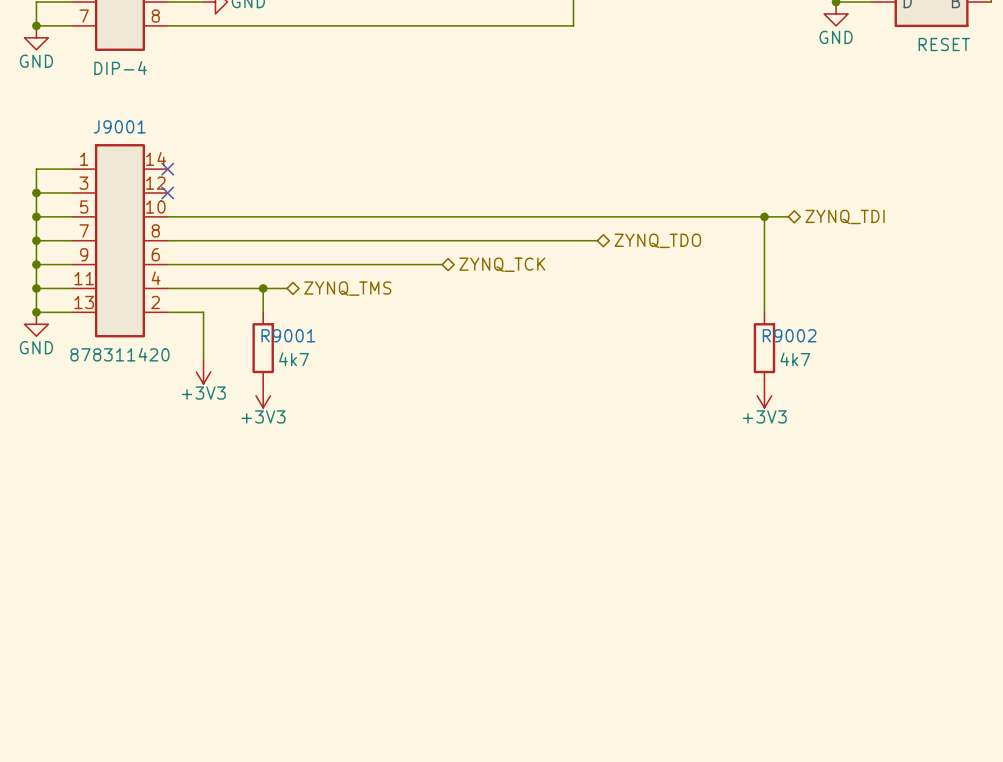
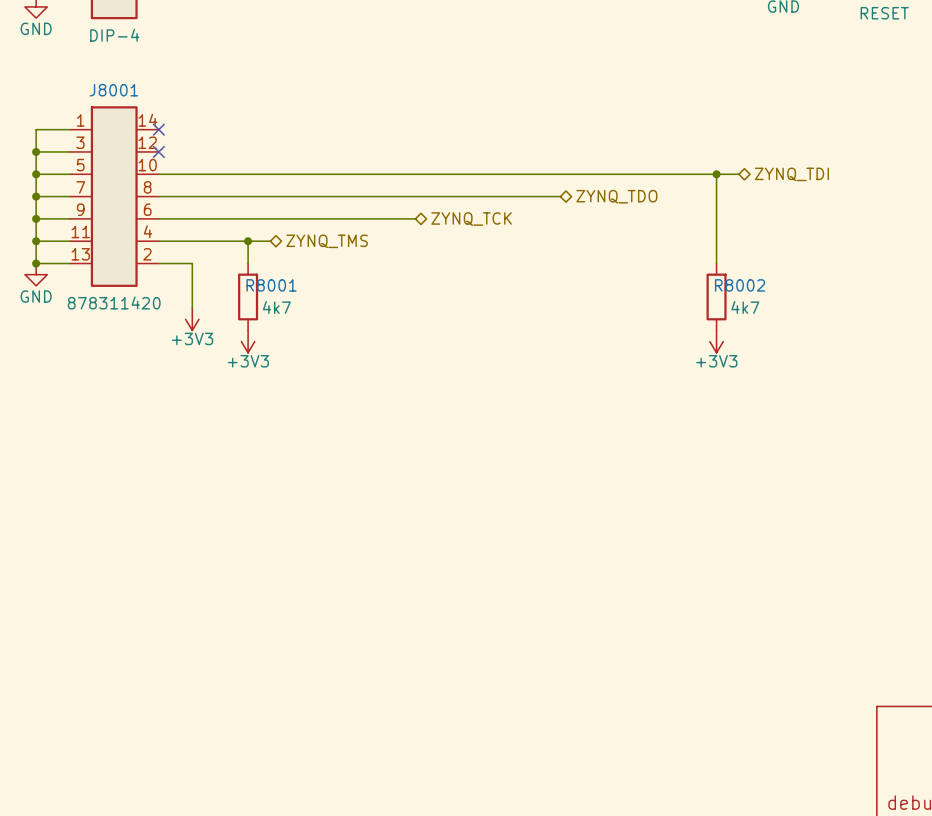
J9001 name: J9001 (119, 126) -> J8001 (113, 90)
R9001 name: R9001 (288, 335) -> R8001 (271, 285)
R9002 name: R9002 (789, 335) -> R8002 (740, 285)

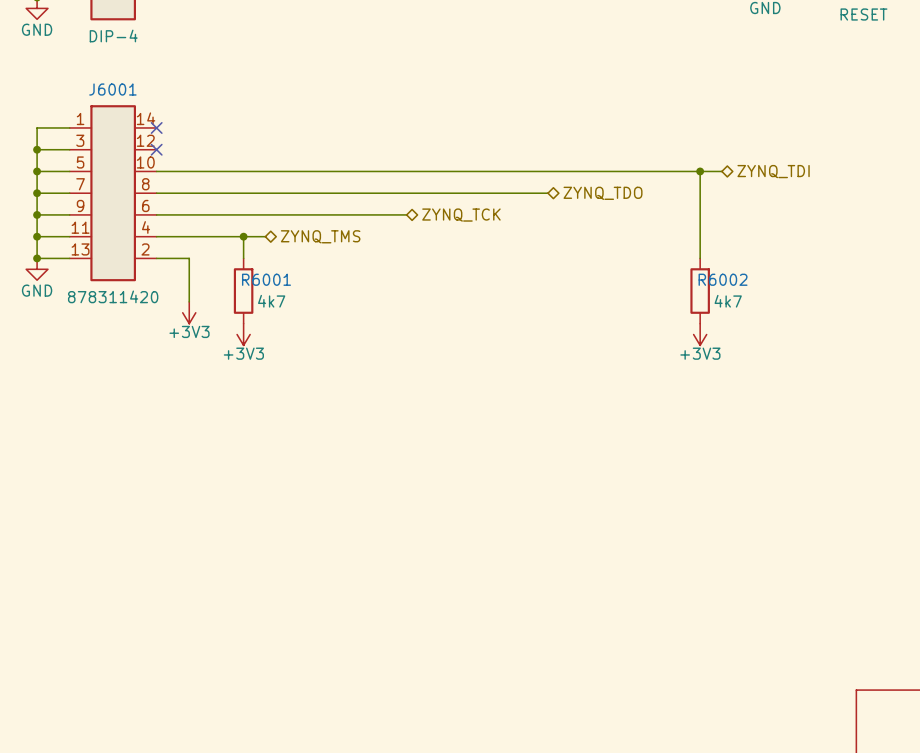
J8001 name: J8001 (113, 90) -> J6001 (112, 89)
R8001 name: R8001 (271, 285) -> R6001 (266, 279)
R8002 name: R8002 (740, 285) -> R6002 (723, 279)

